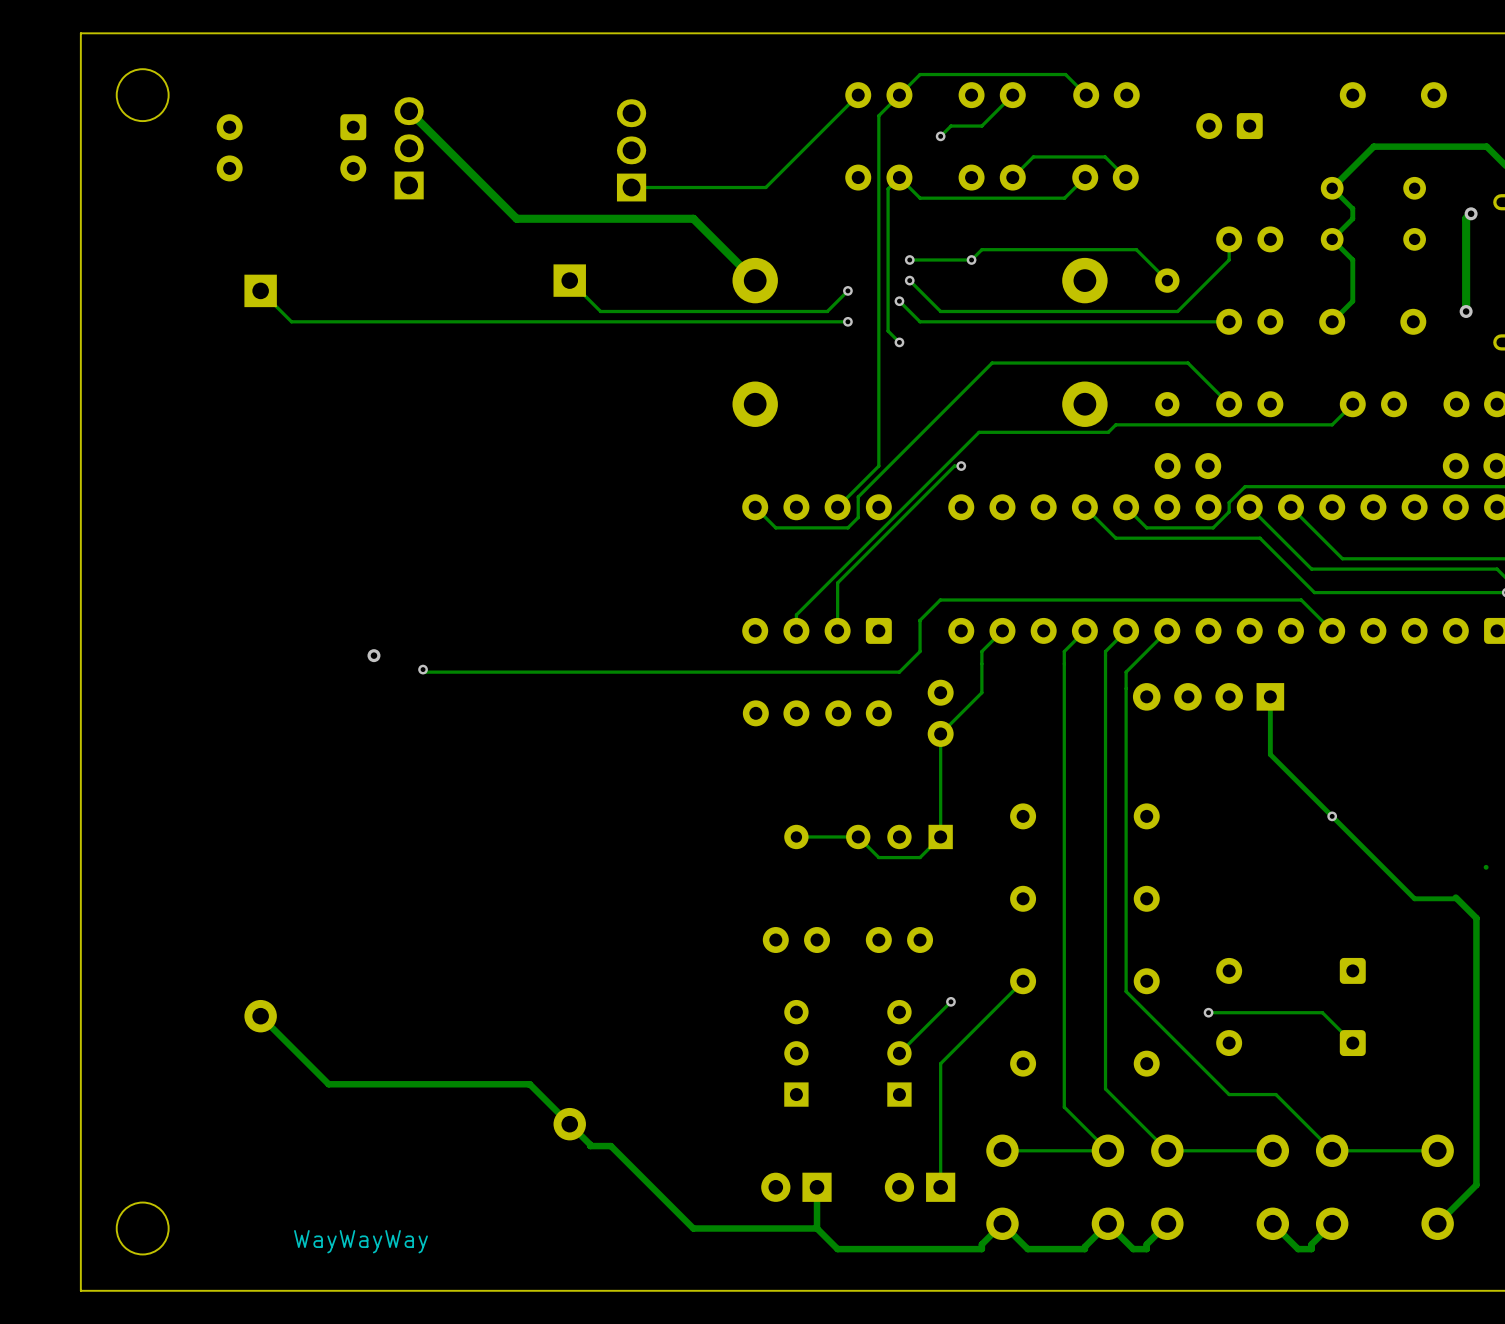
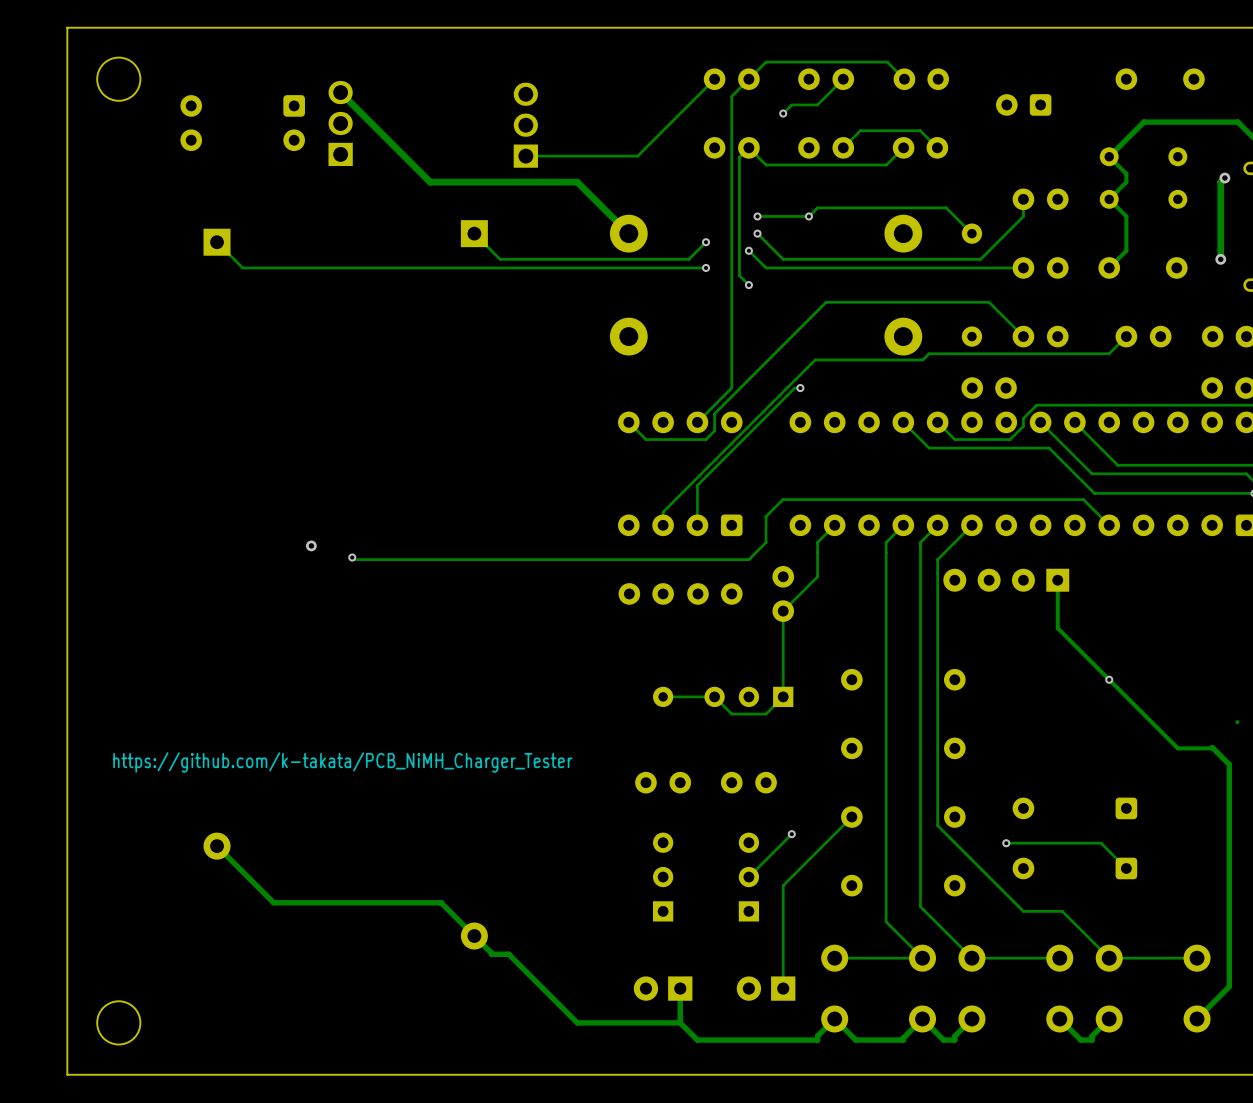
text: none -> https://github.com/k-takata/PCB_NiMH_Charger_Tester (342, 762)
text: WayWayWay (361, 1241) -> none

